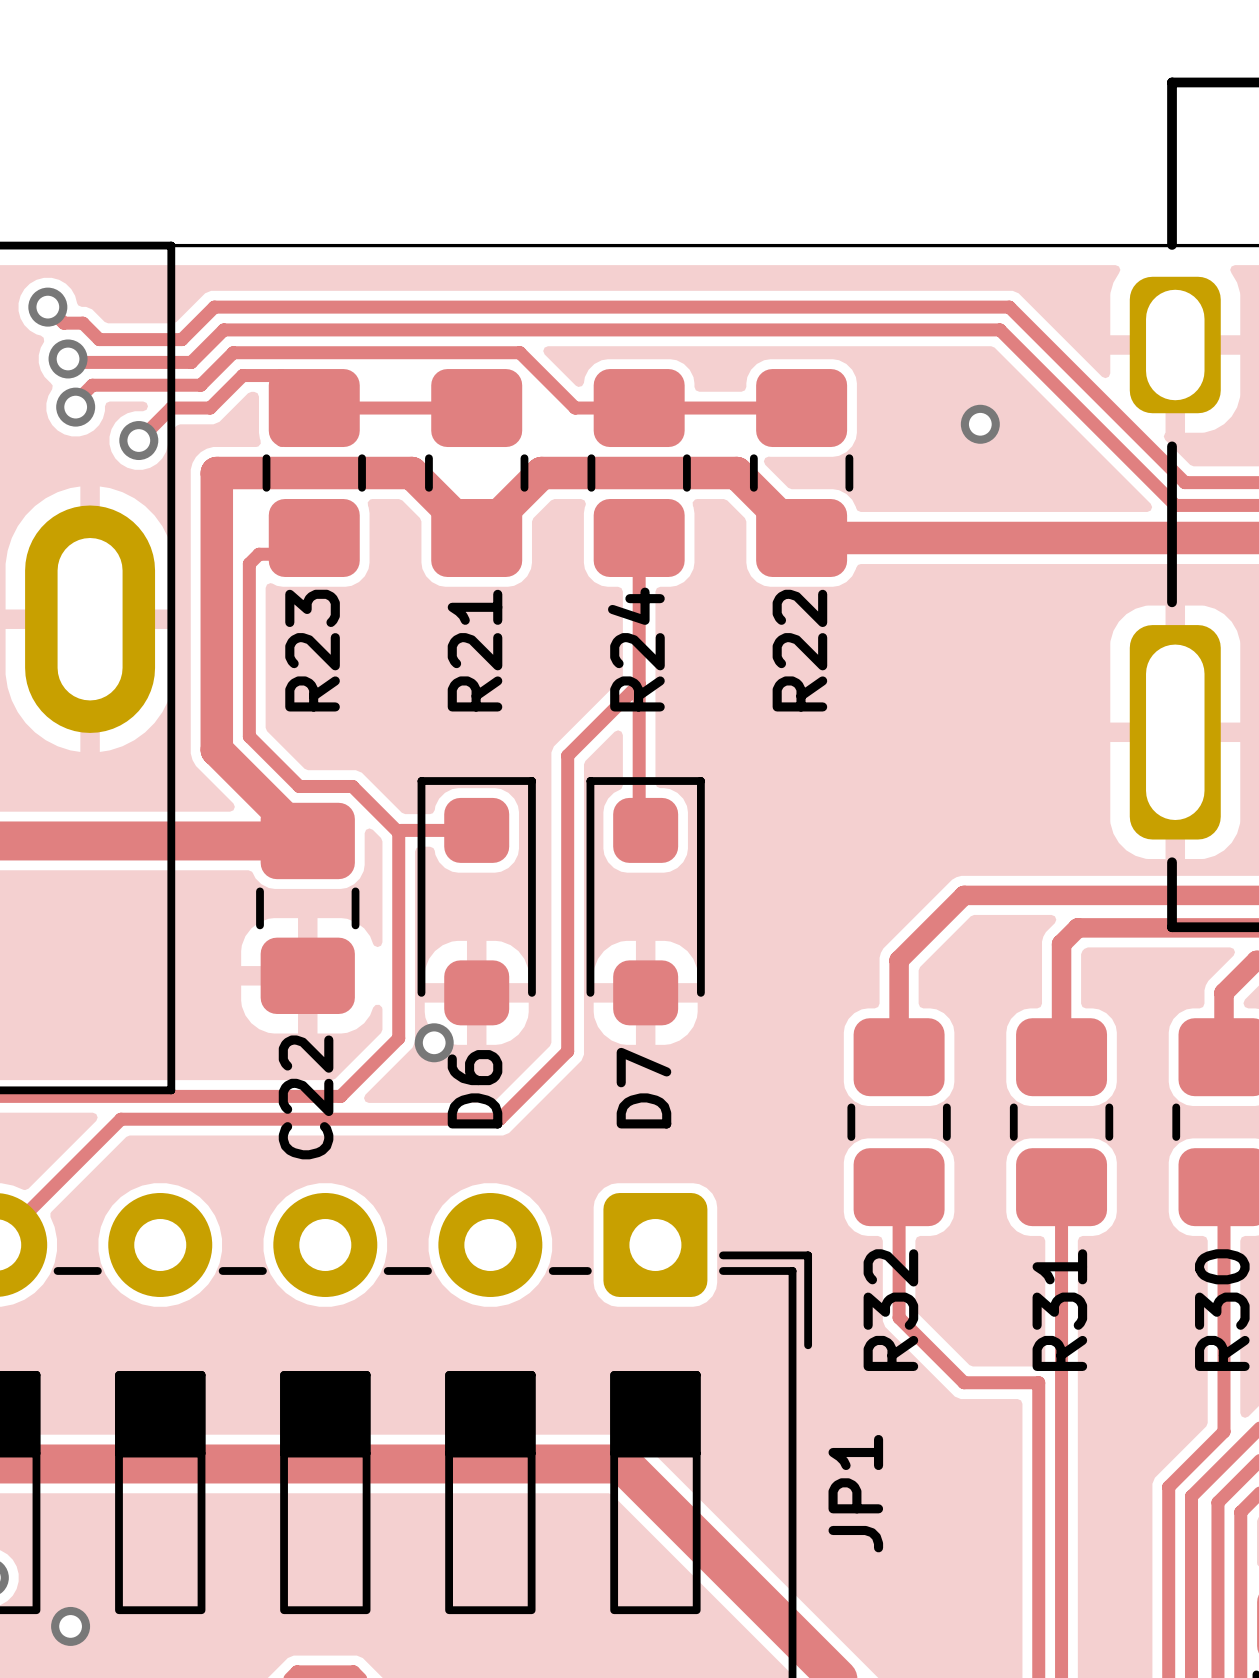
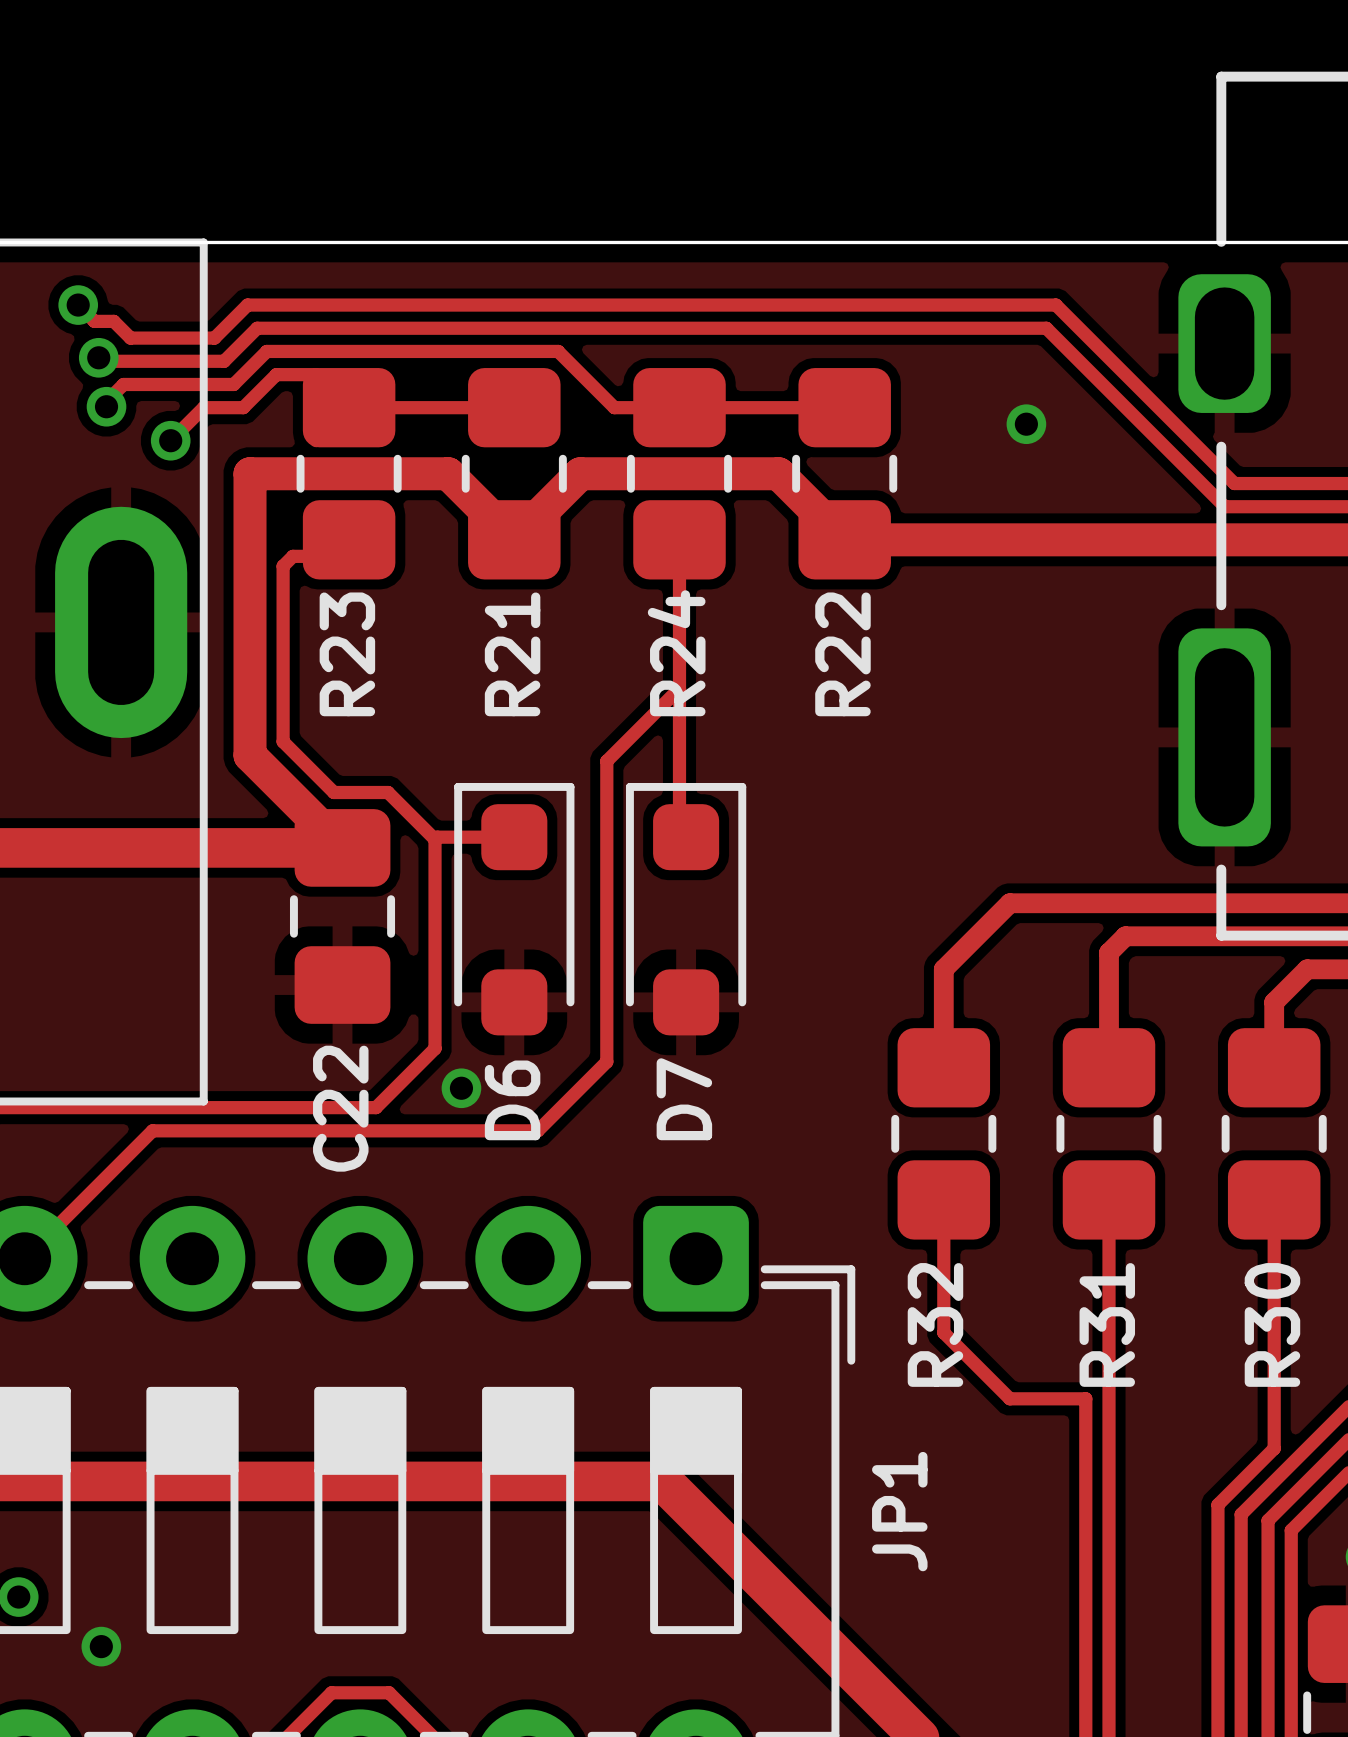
via position: (434, 1042) -> (461, 1088)

